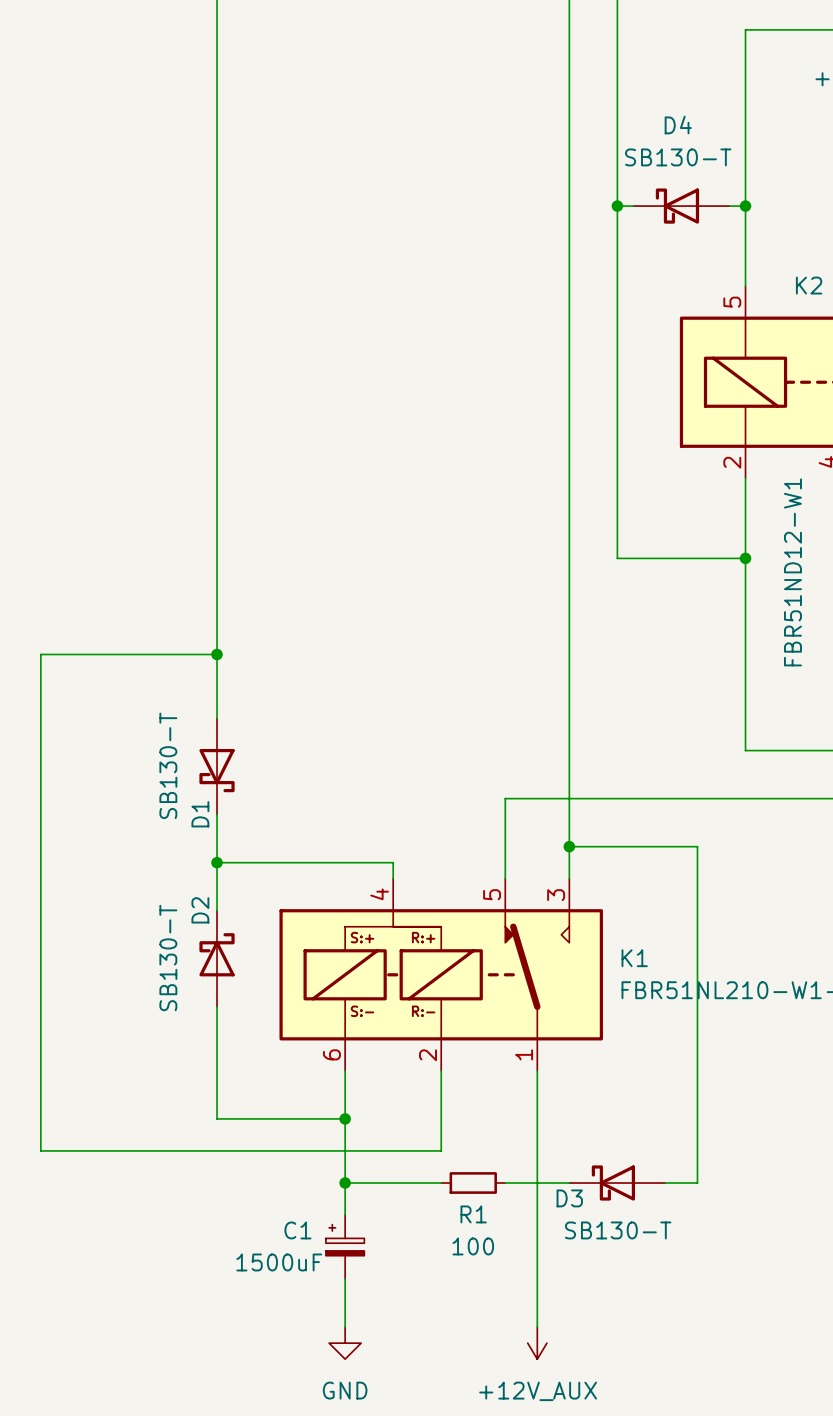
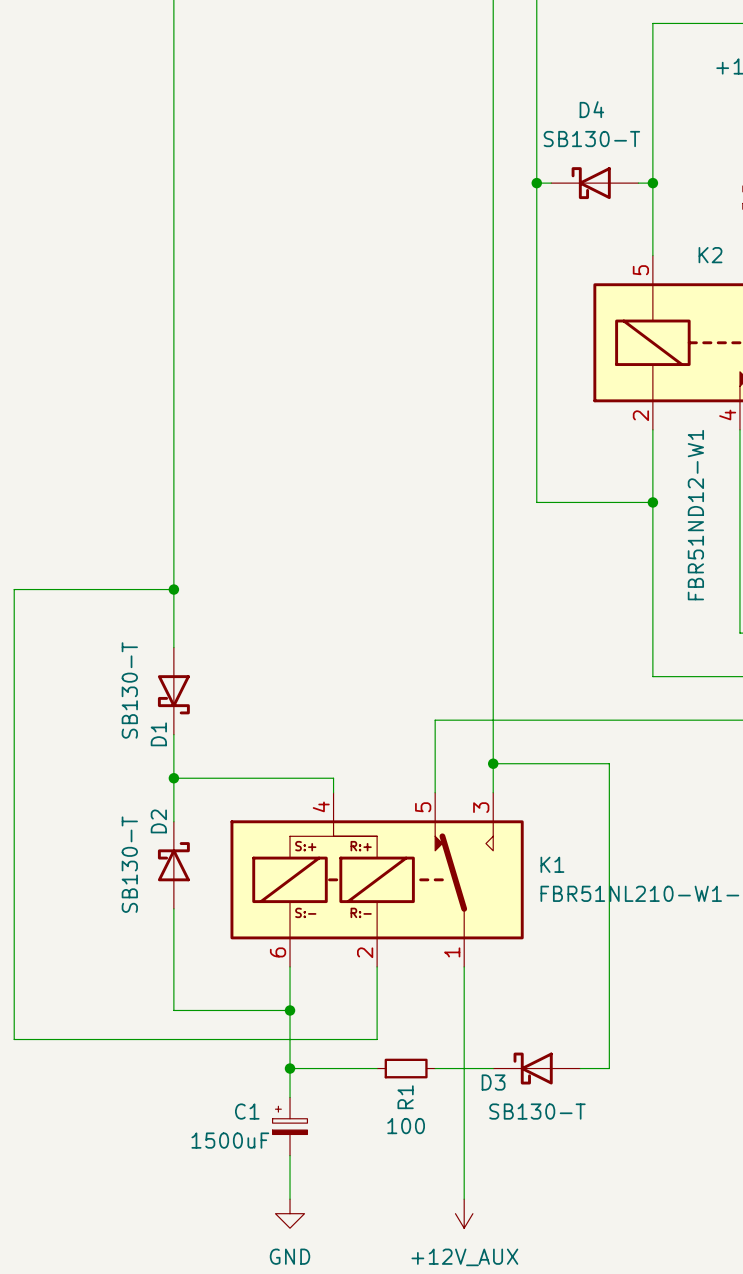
R1 name rotation: 0° (473, 1214) -> 90° counterclockwise (405, 1097)

